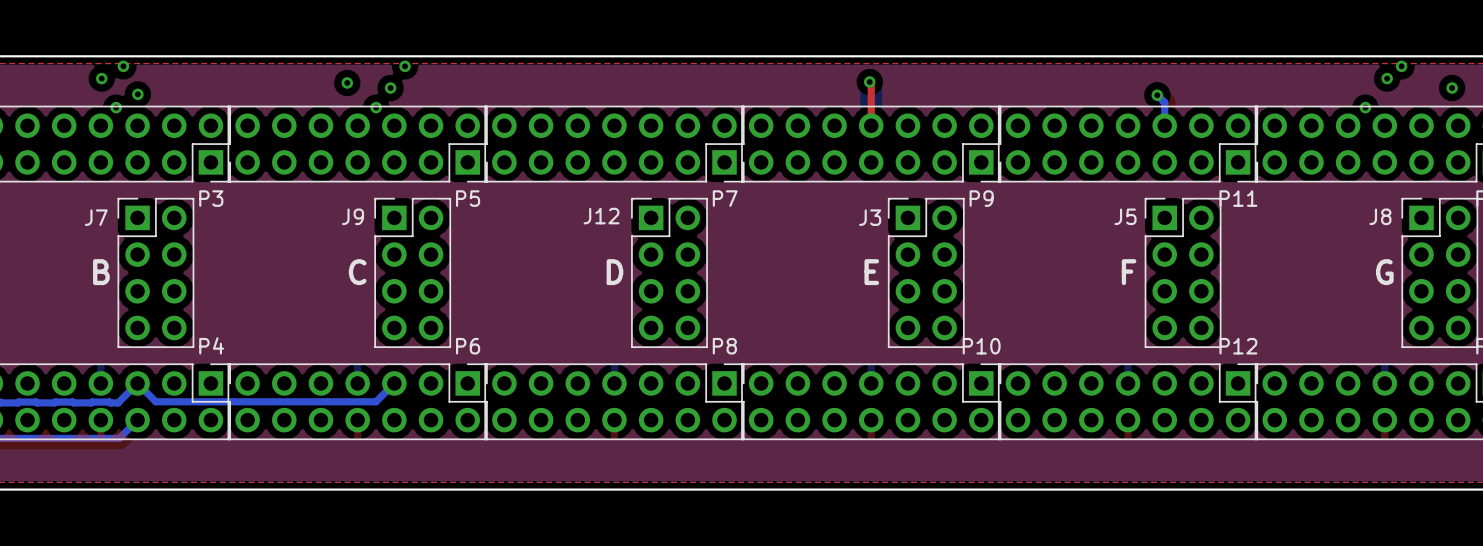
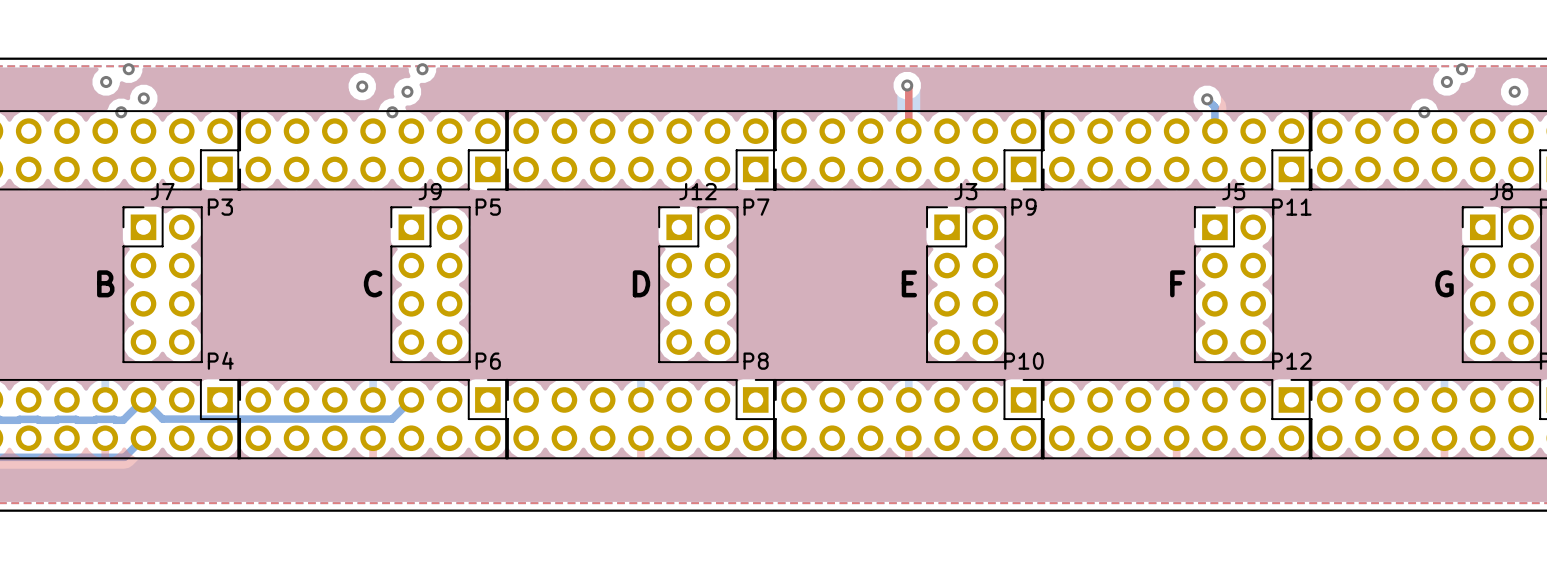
J9 name position: J9 (353, 216) -> J9 (430, 191)
J12 name position: J12 (601, 216) -> J12 (697, 191)
J5 name position: J5 (1125, 216) -> J5 (1233, 191)
J8 name position: J8 (1380, 216) -> J8 (1501, 191)
J7 name position: J7 (96, 217) -> J7 (162, 191)
J3 name position: J3 (870, 217) -> J3 (965, 191)

